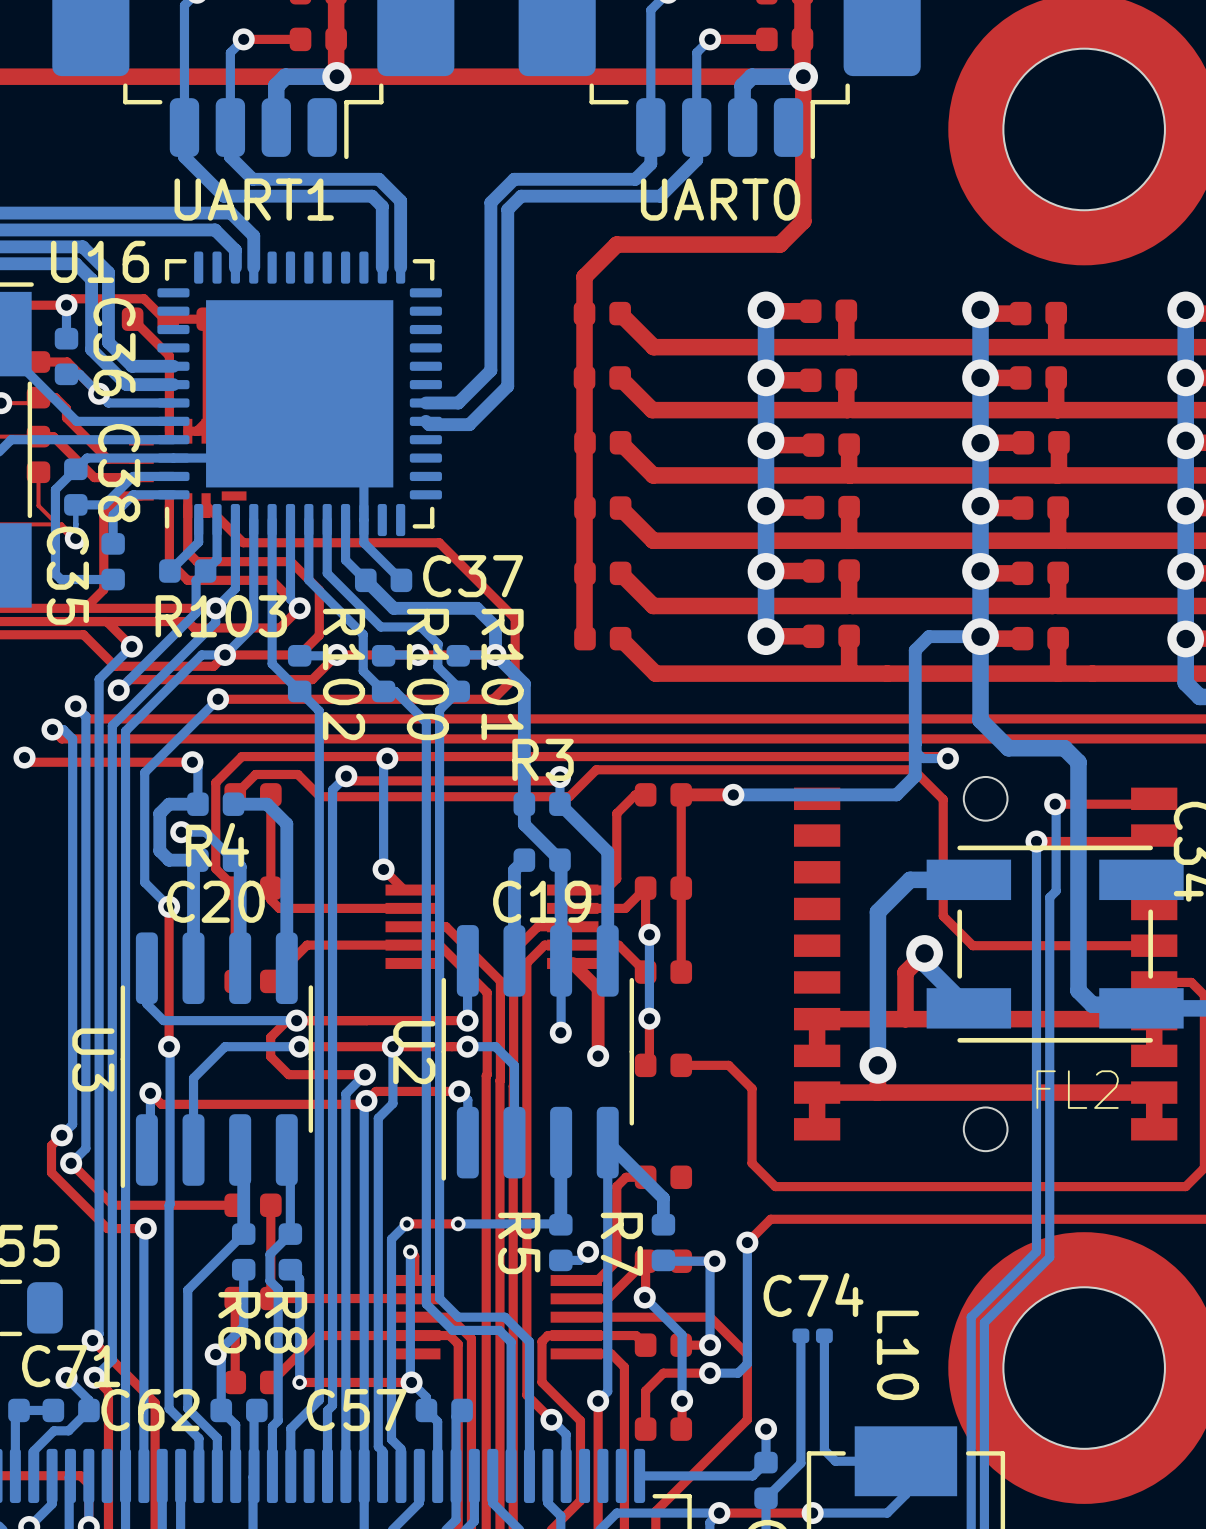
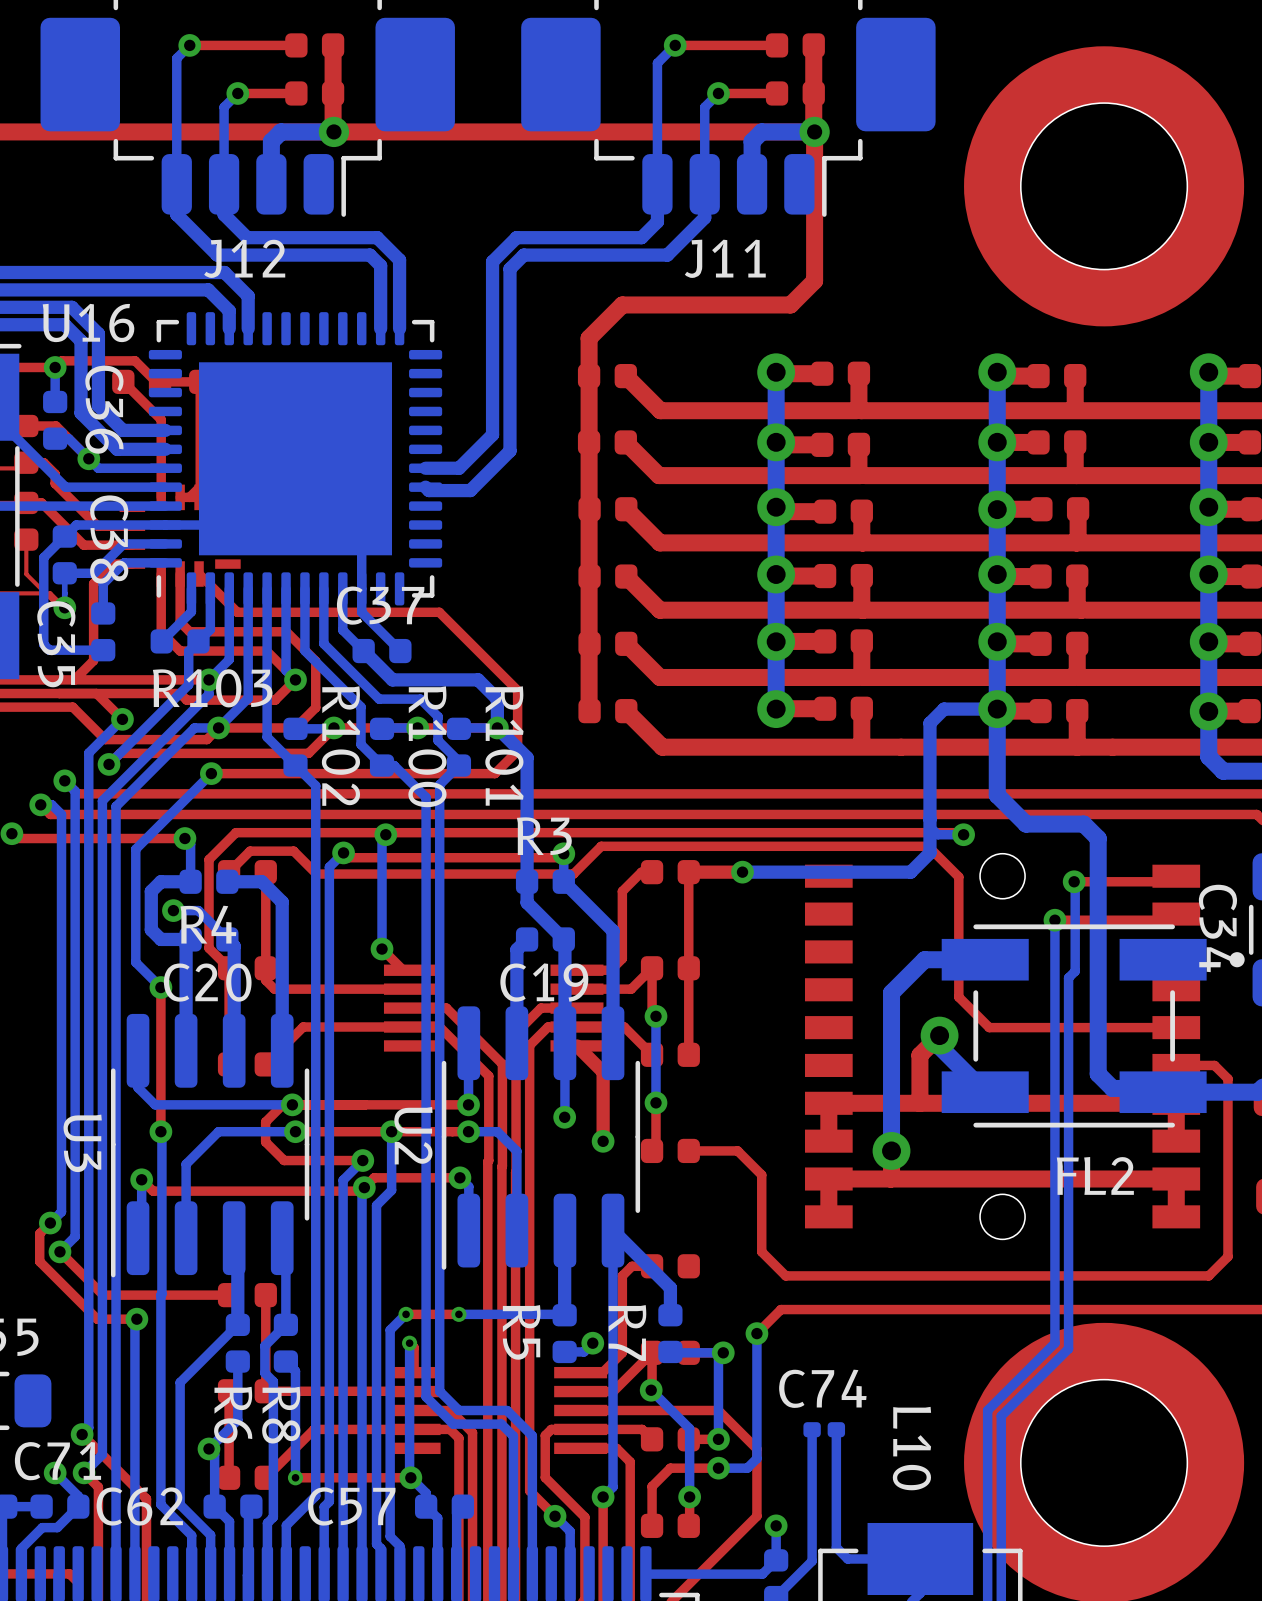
UART1 name: UART1 (254, 199) -> J12 (244, 258)
UART0 name: UART0 (720, 199) -> J11 (725, 258)
C37 name position: C37 (473, 576) -> C37 (380, 605)

